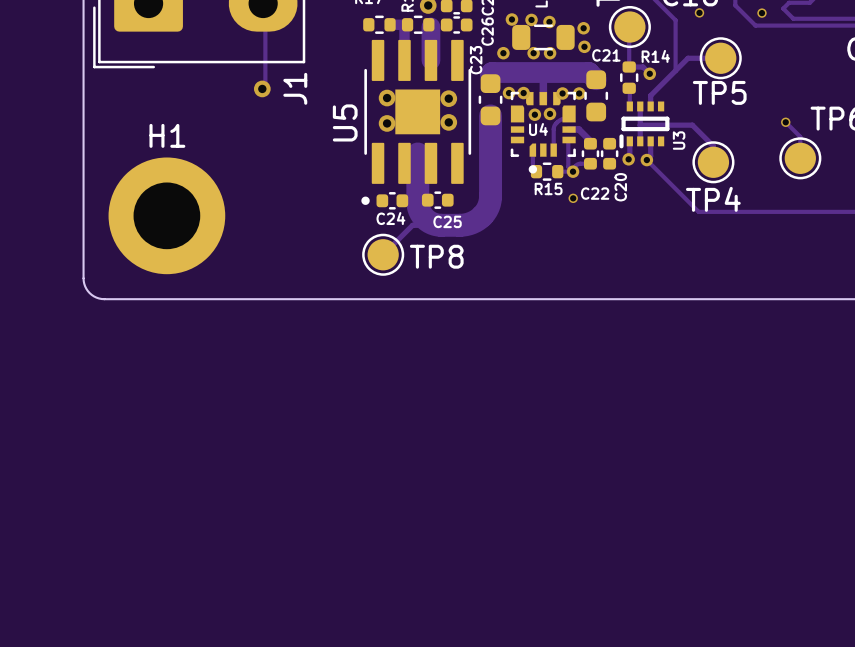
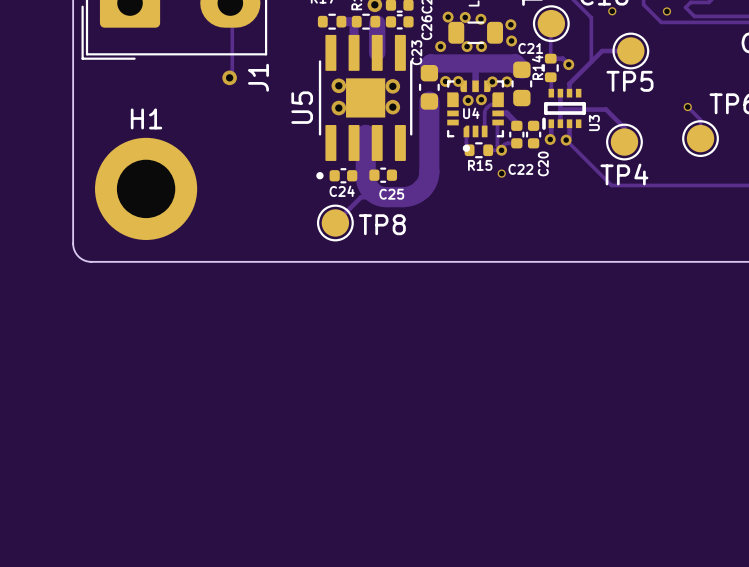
R14 name rotation: 0° (655, 56) -> 90° counterclockwise (537, 67)
R14 name position: R14 (655, 56) -> R14 (537, 67)

